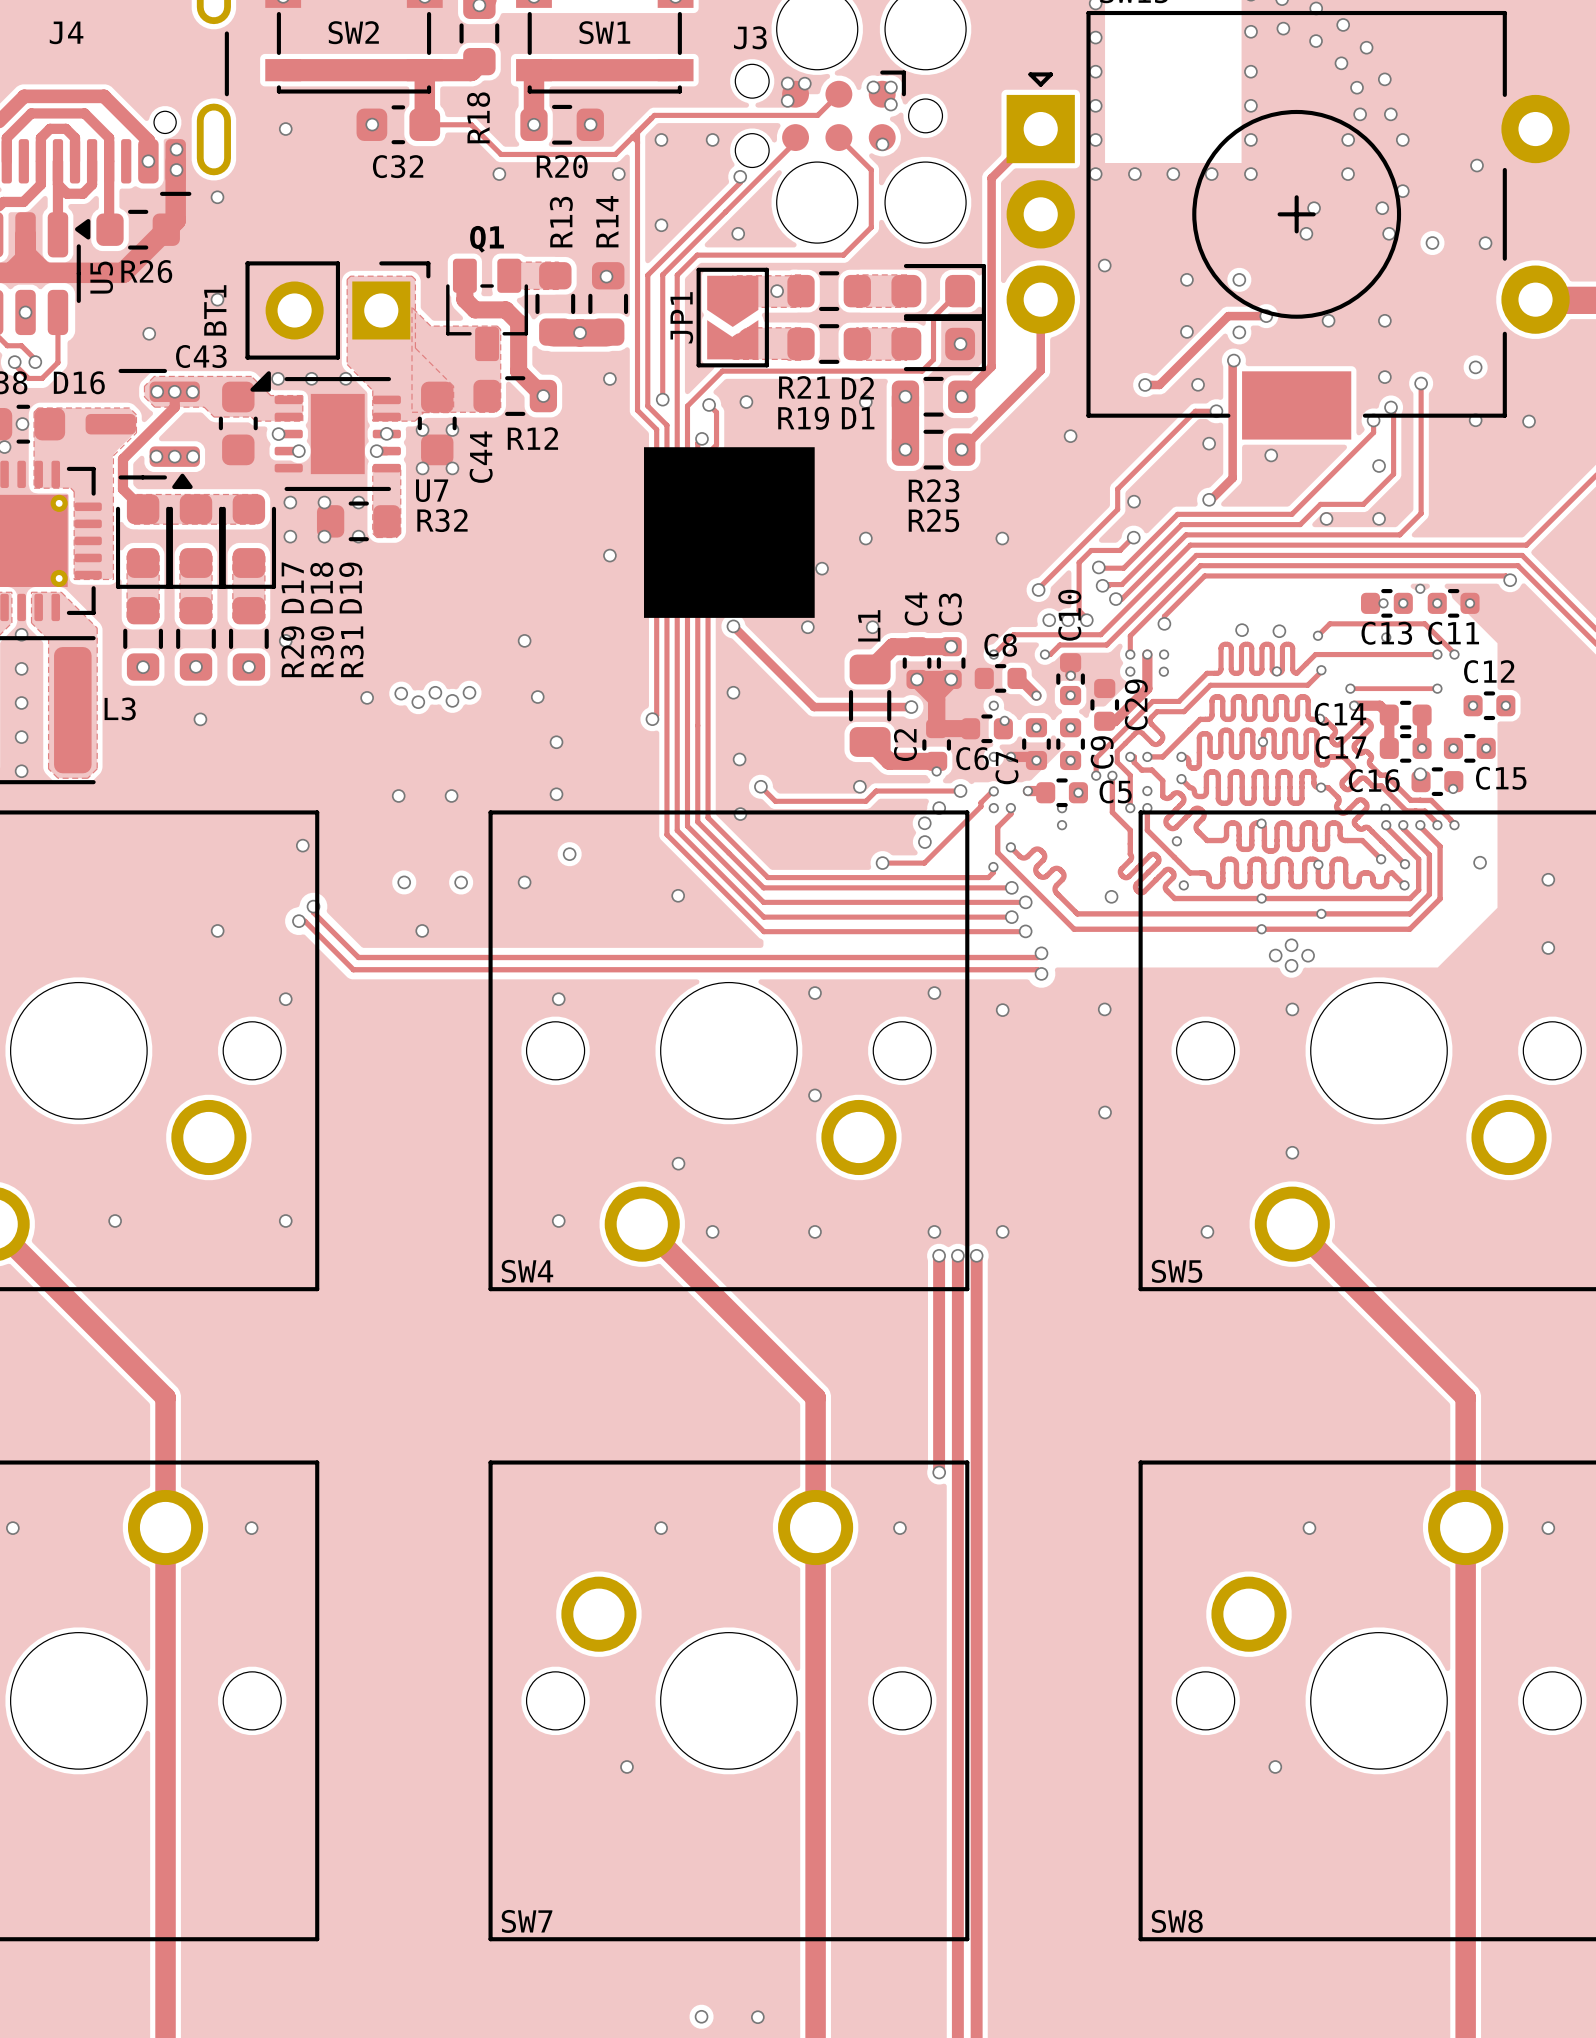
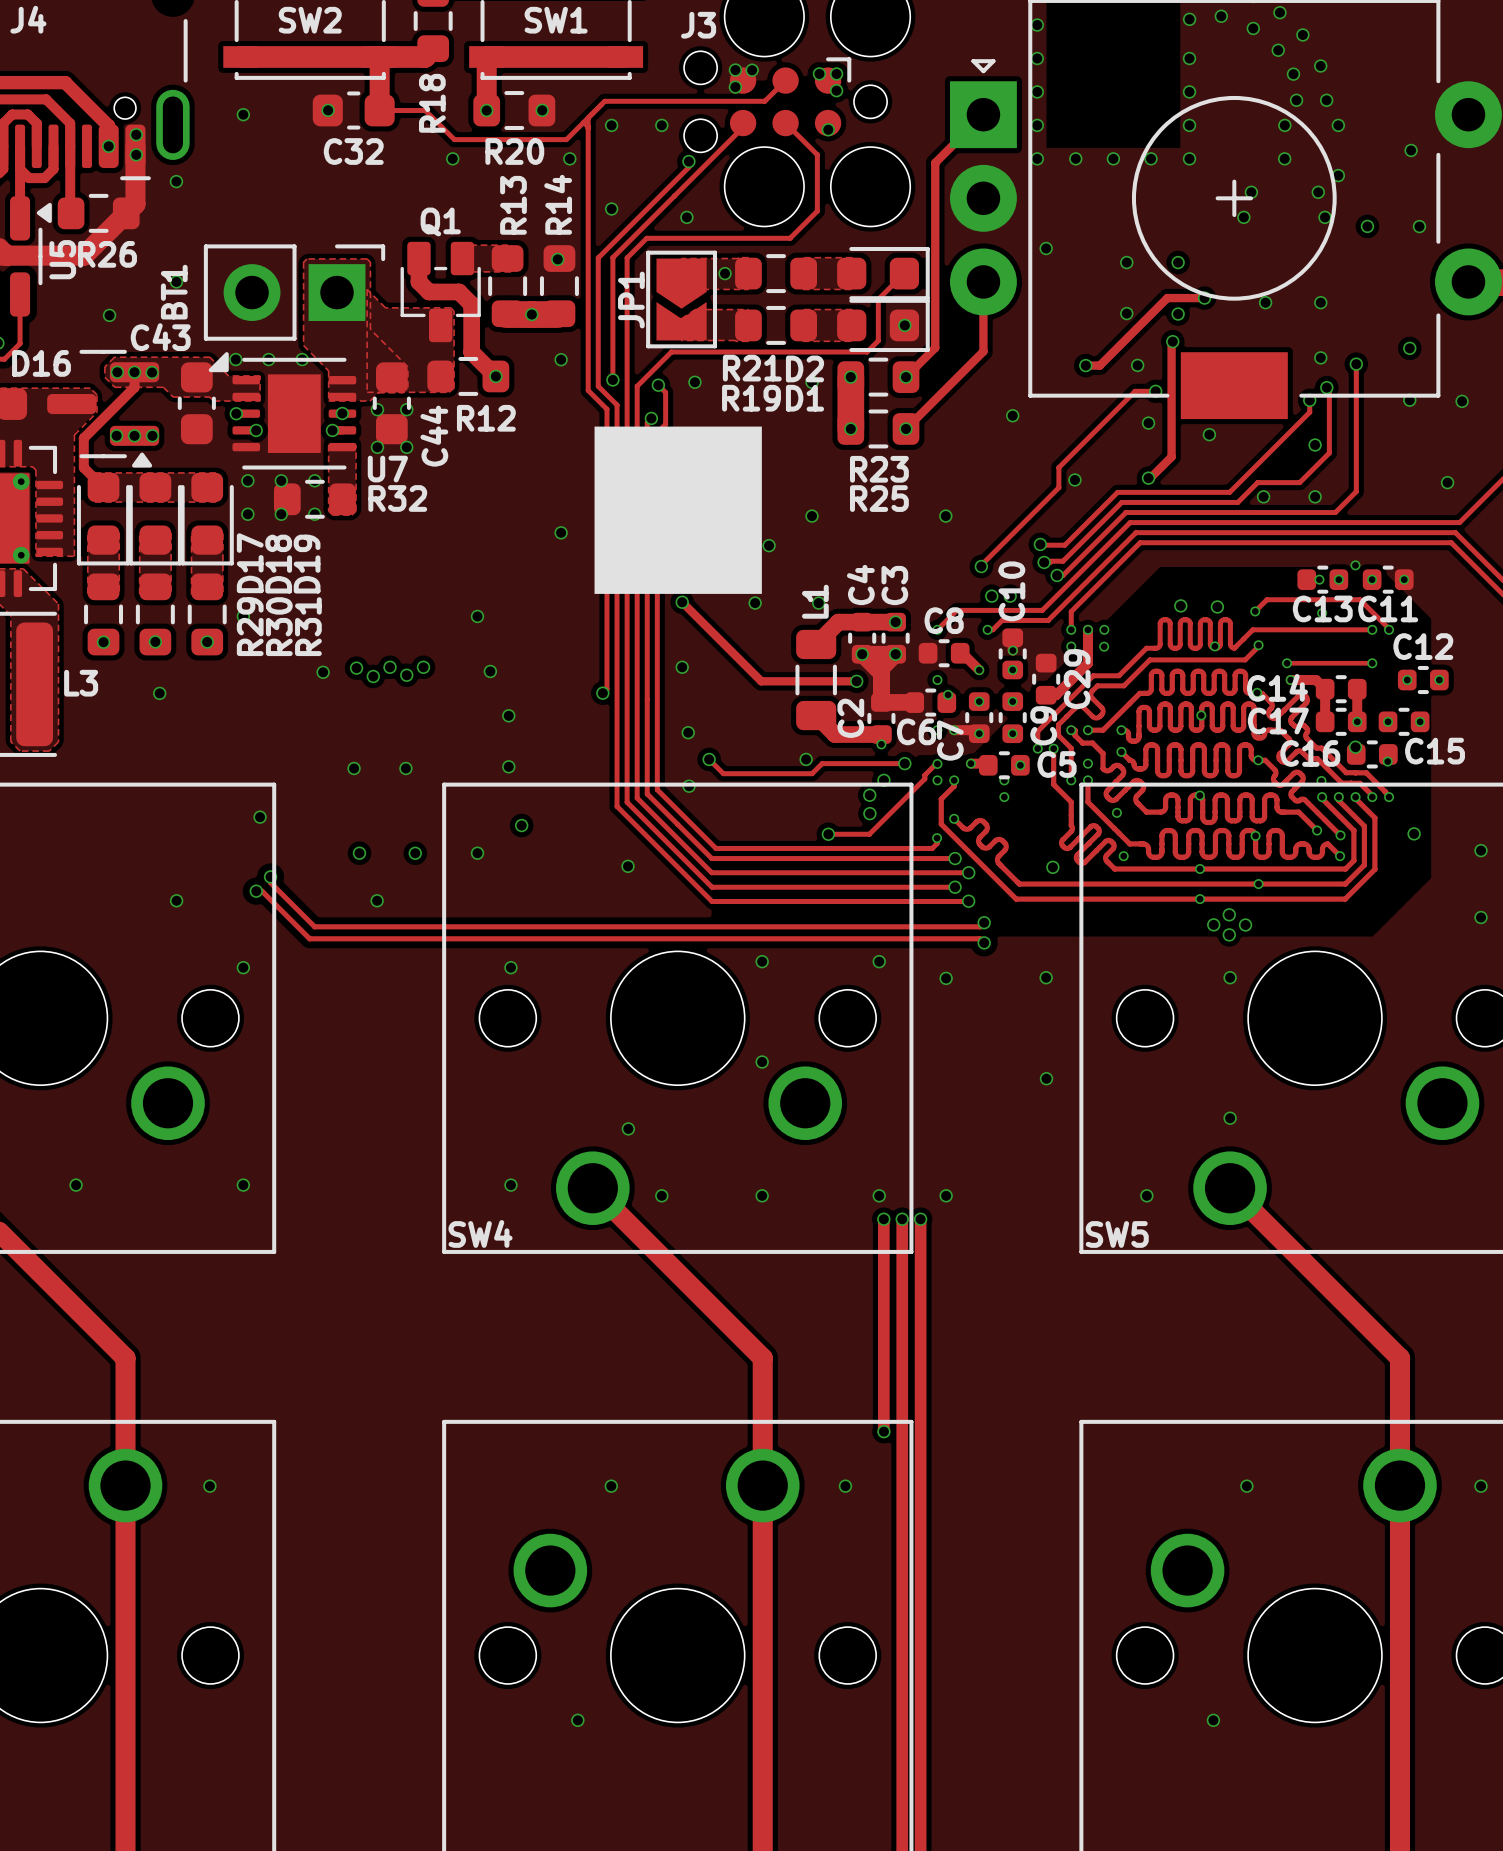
track: (1133, 537) (1120, 550) (1091, 550) (1079, 562) (1079, 610) (1086, 620) -> none
via: (1133, 537) -> none
track: (1510, 580) (1505, 575) (1204, 575) (1164, 616) (1164, 623) -> none
via position: (1510, 580) -> (1447, 482)
via: (1086, 620) -> none
via: (1164, 623) -> none

